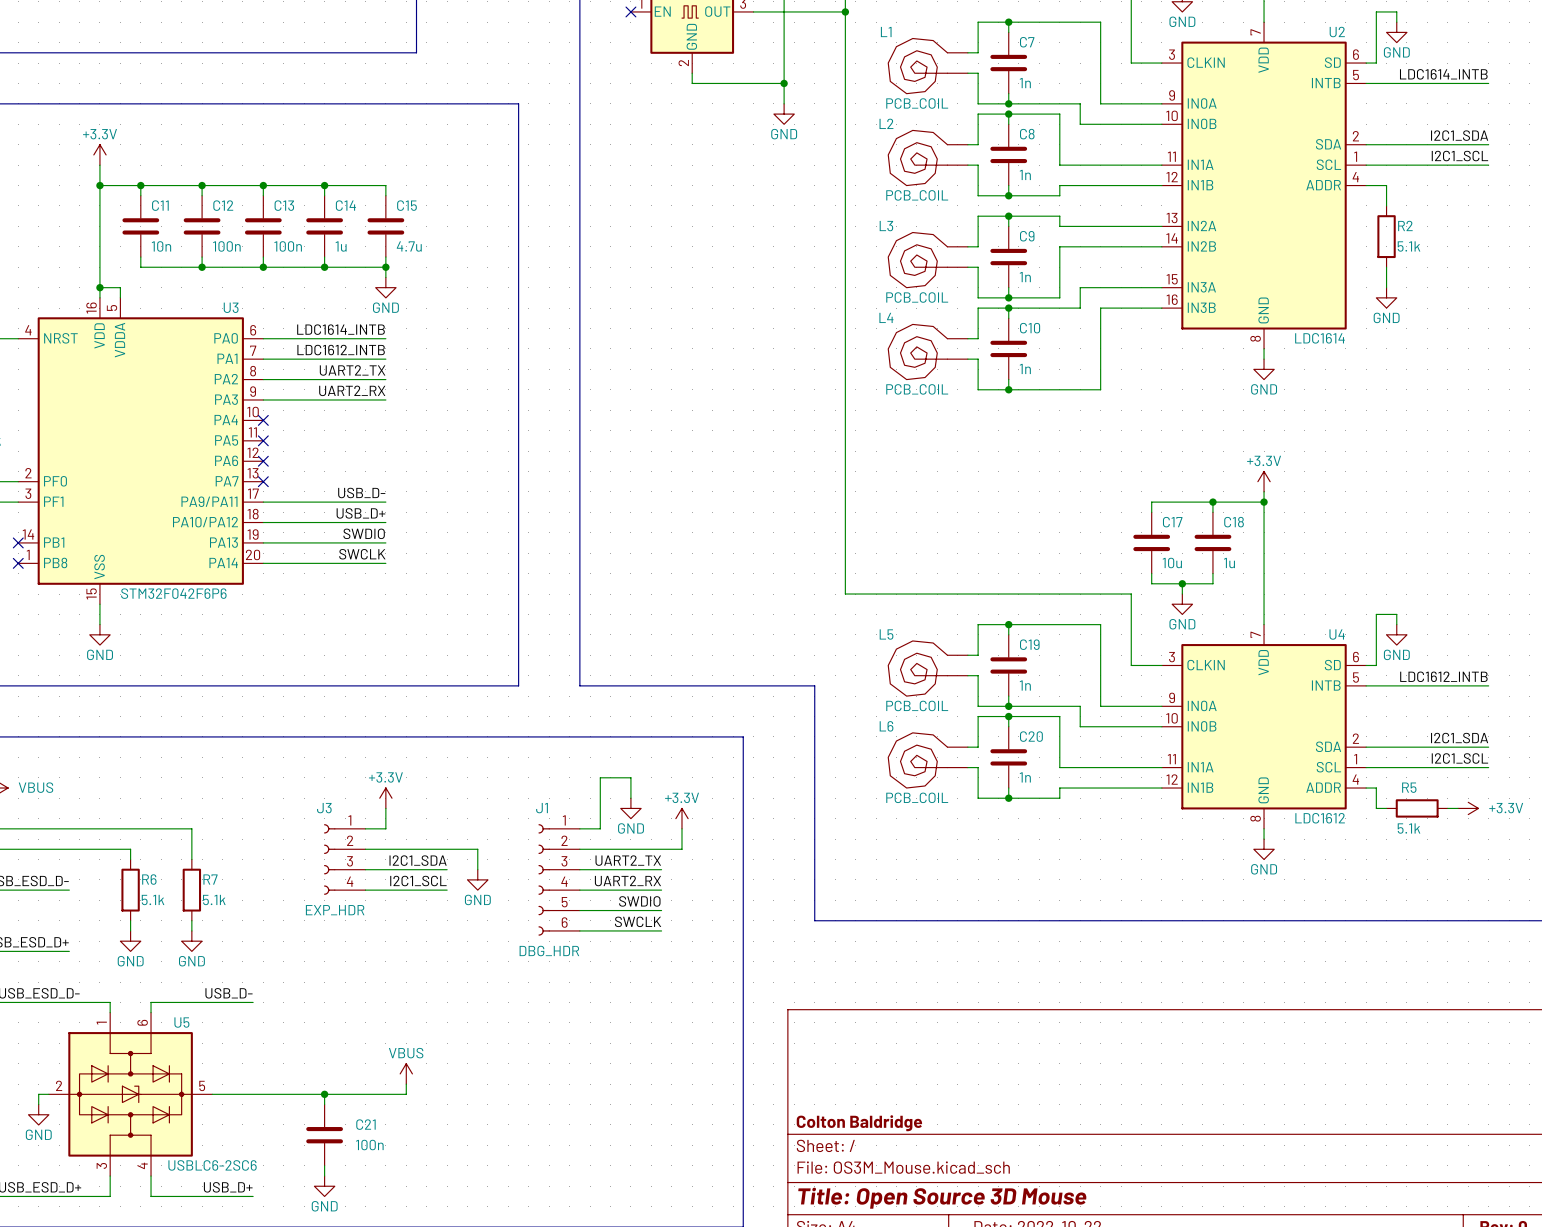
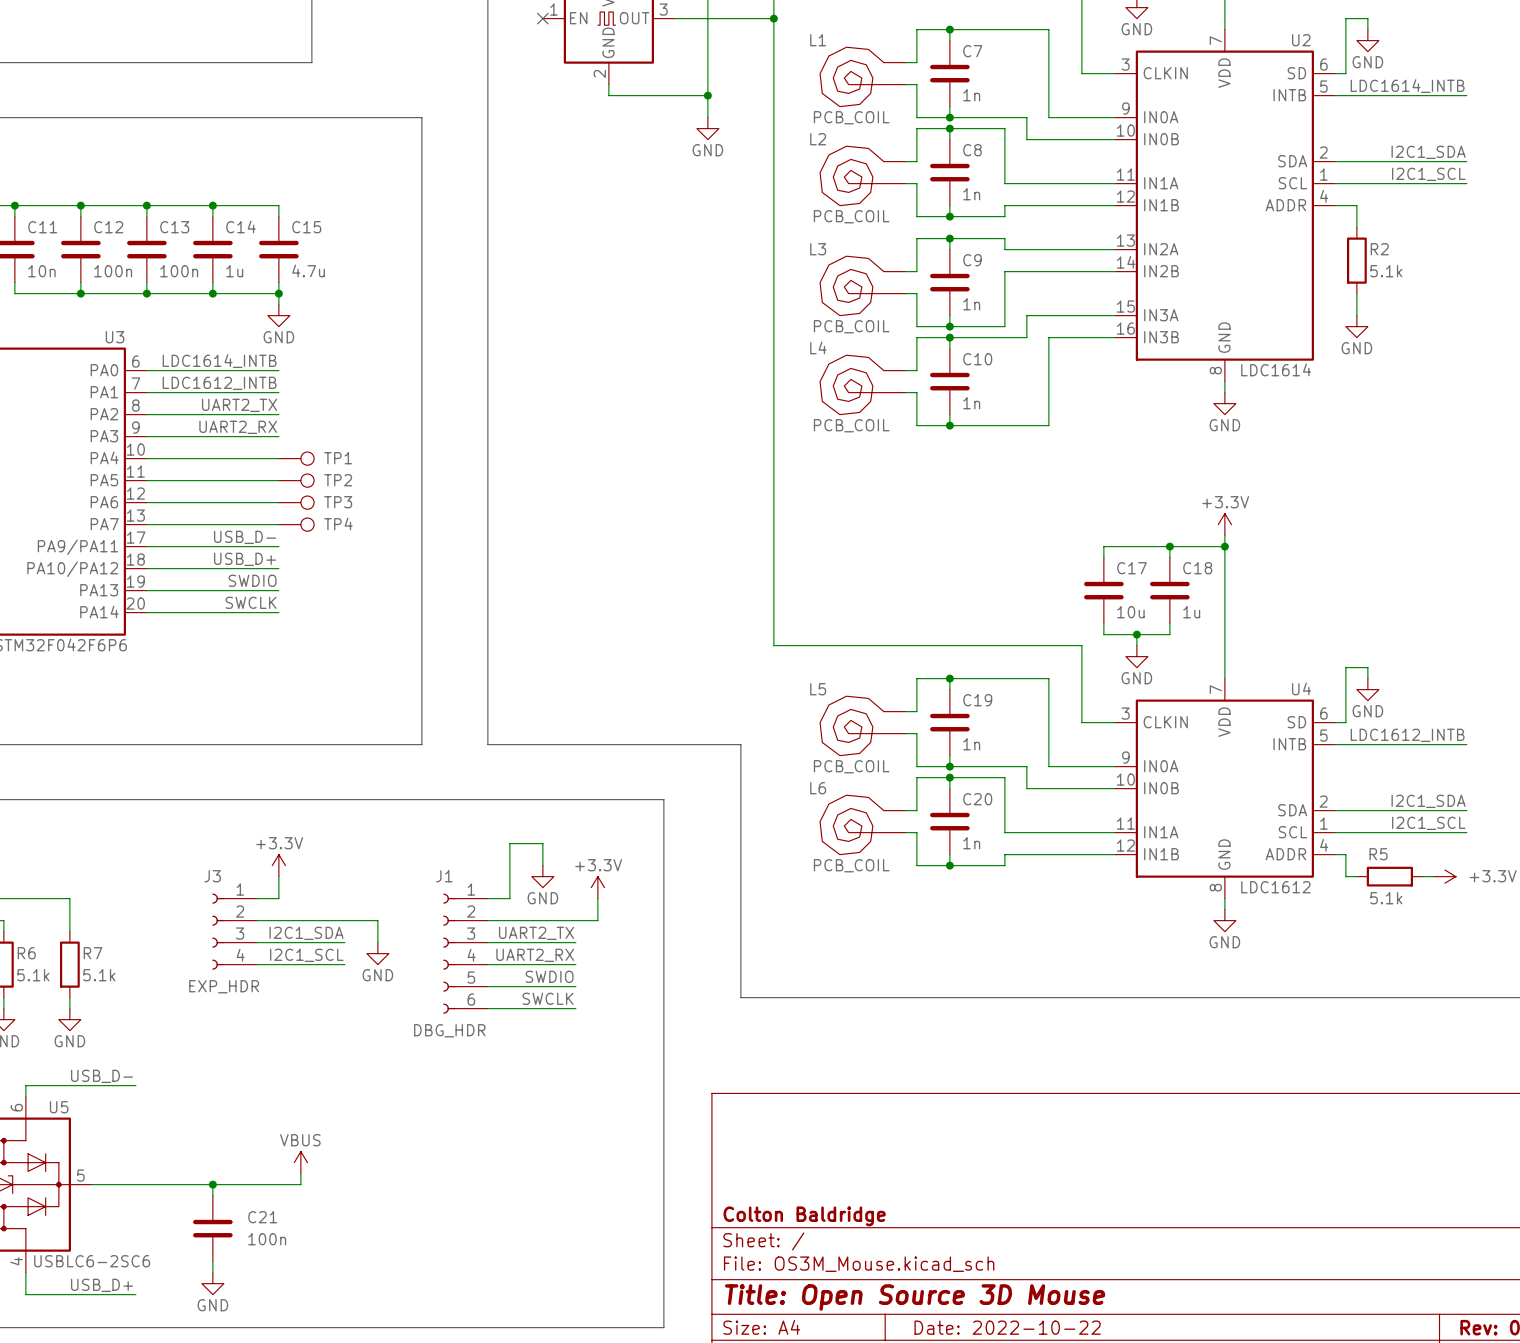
wire: none -> (146, 458) (278, 458)
no-connect mark: (263, 420) -> none
TP1: none -> (296, 458)
wire: none -> (146, 480) (278, 480)
no-connect mark: (263, 440) -> none
TP2: none -> (296, 480)
wire: none -> (146, 502) (278, 502)
no-connect mark: (263, 461) -> none
TP3: none -> (296, 502)
wire: none -> (146, 524) (278, 524)
no-connect mark: (263, 481) -> none
TP4: none -> (296, 524)

